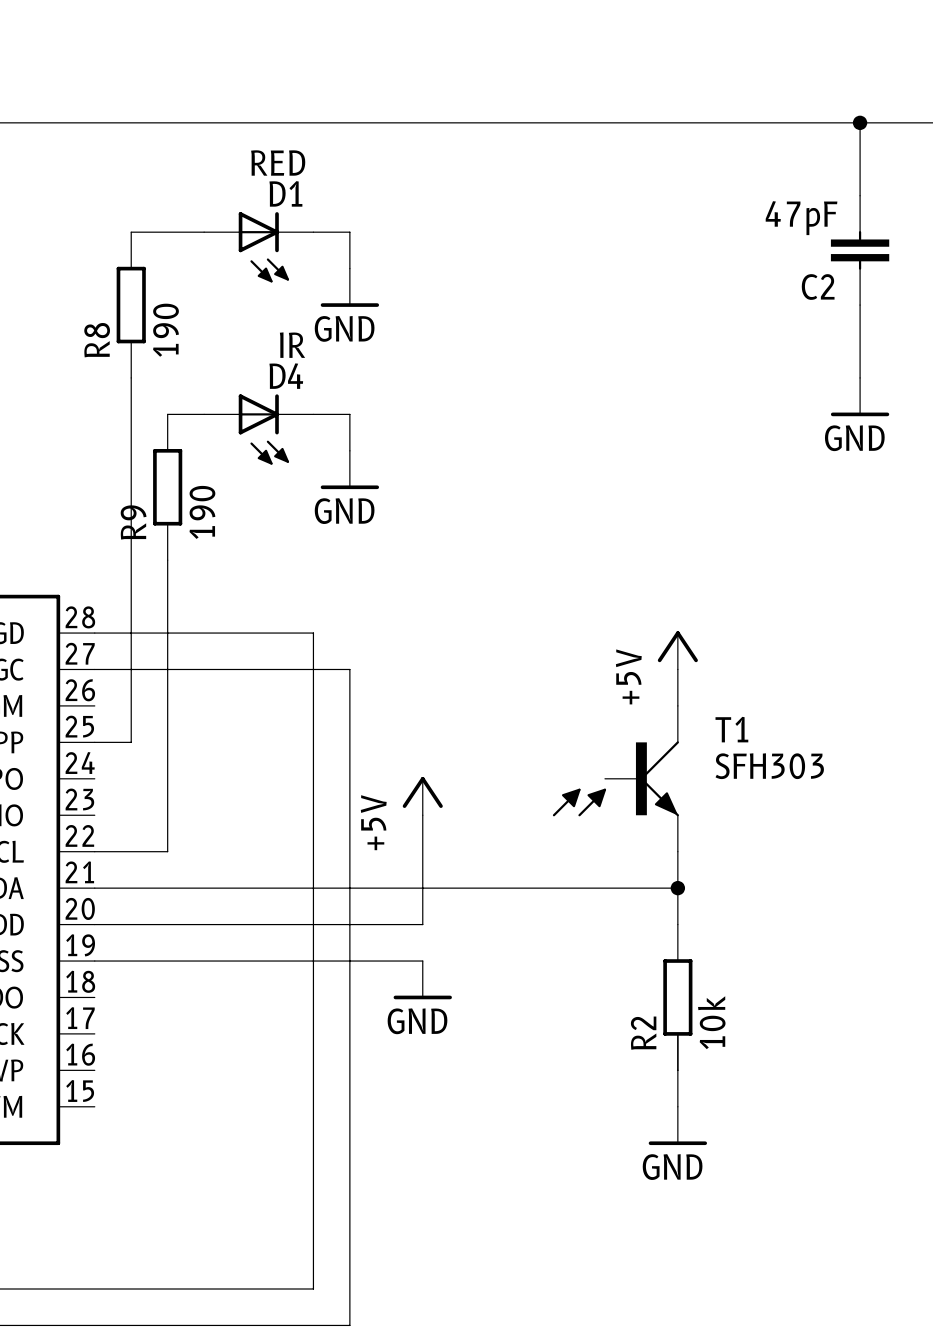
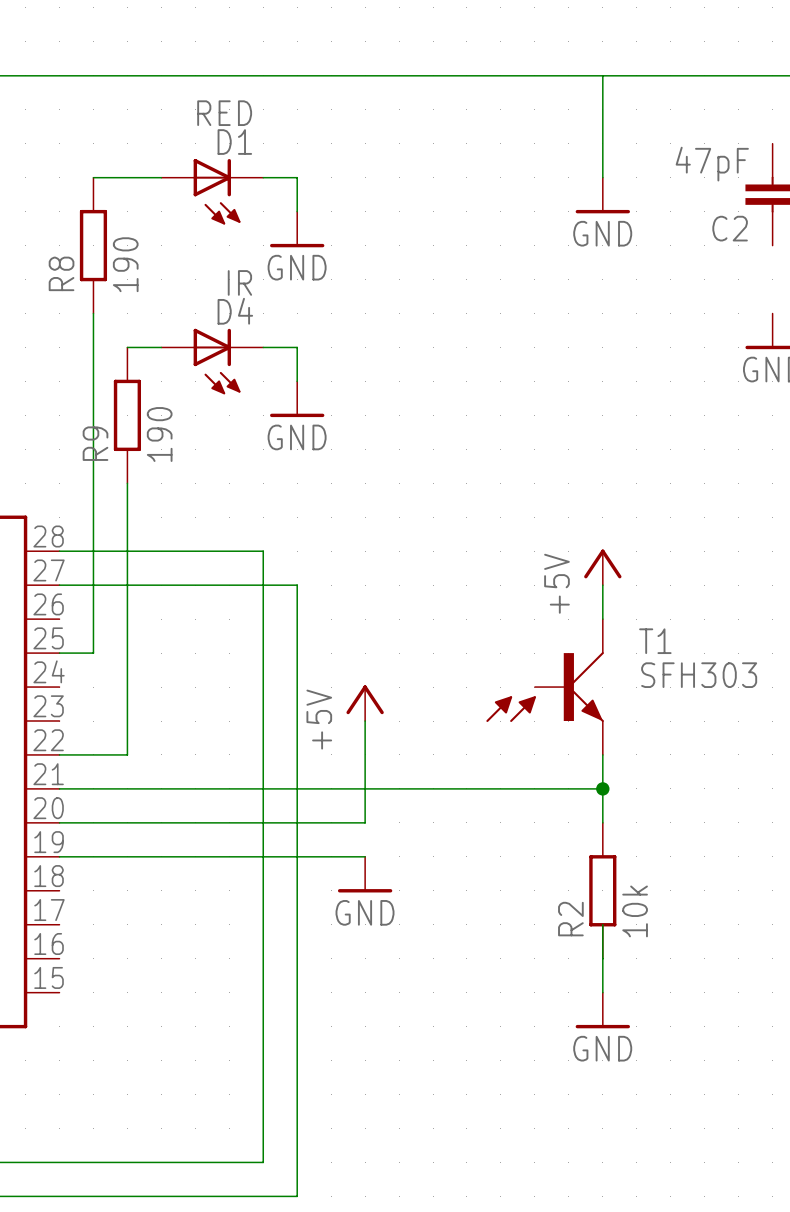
wire: none -> (602, 75) (602, 177)
wire: (860, 122) (860, 195) -> none
junction: (860, 122) -> none
power symbol: none -> GND (602, 195)
wire: (860, 305) (860, 377) -> none

